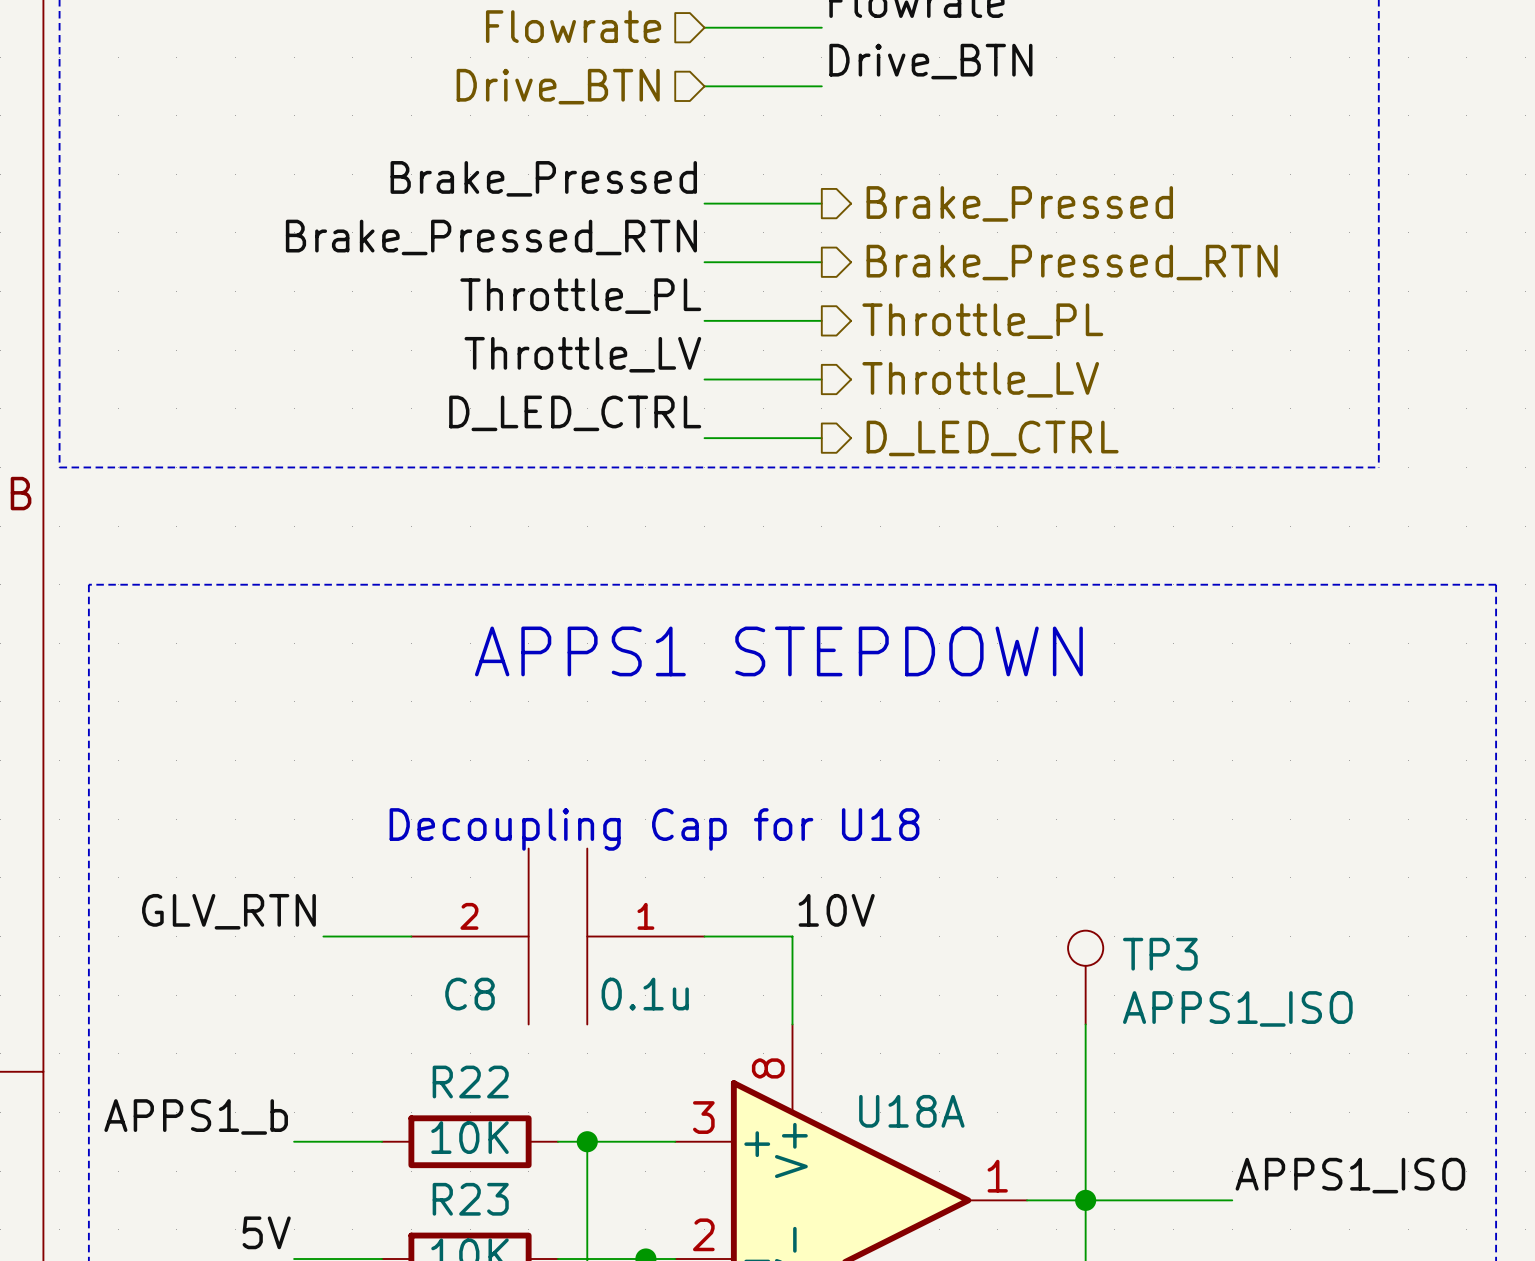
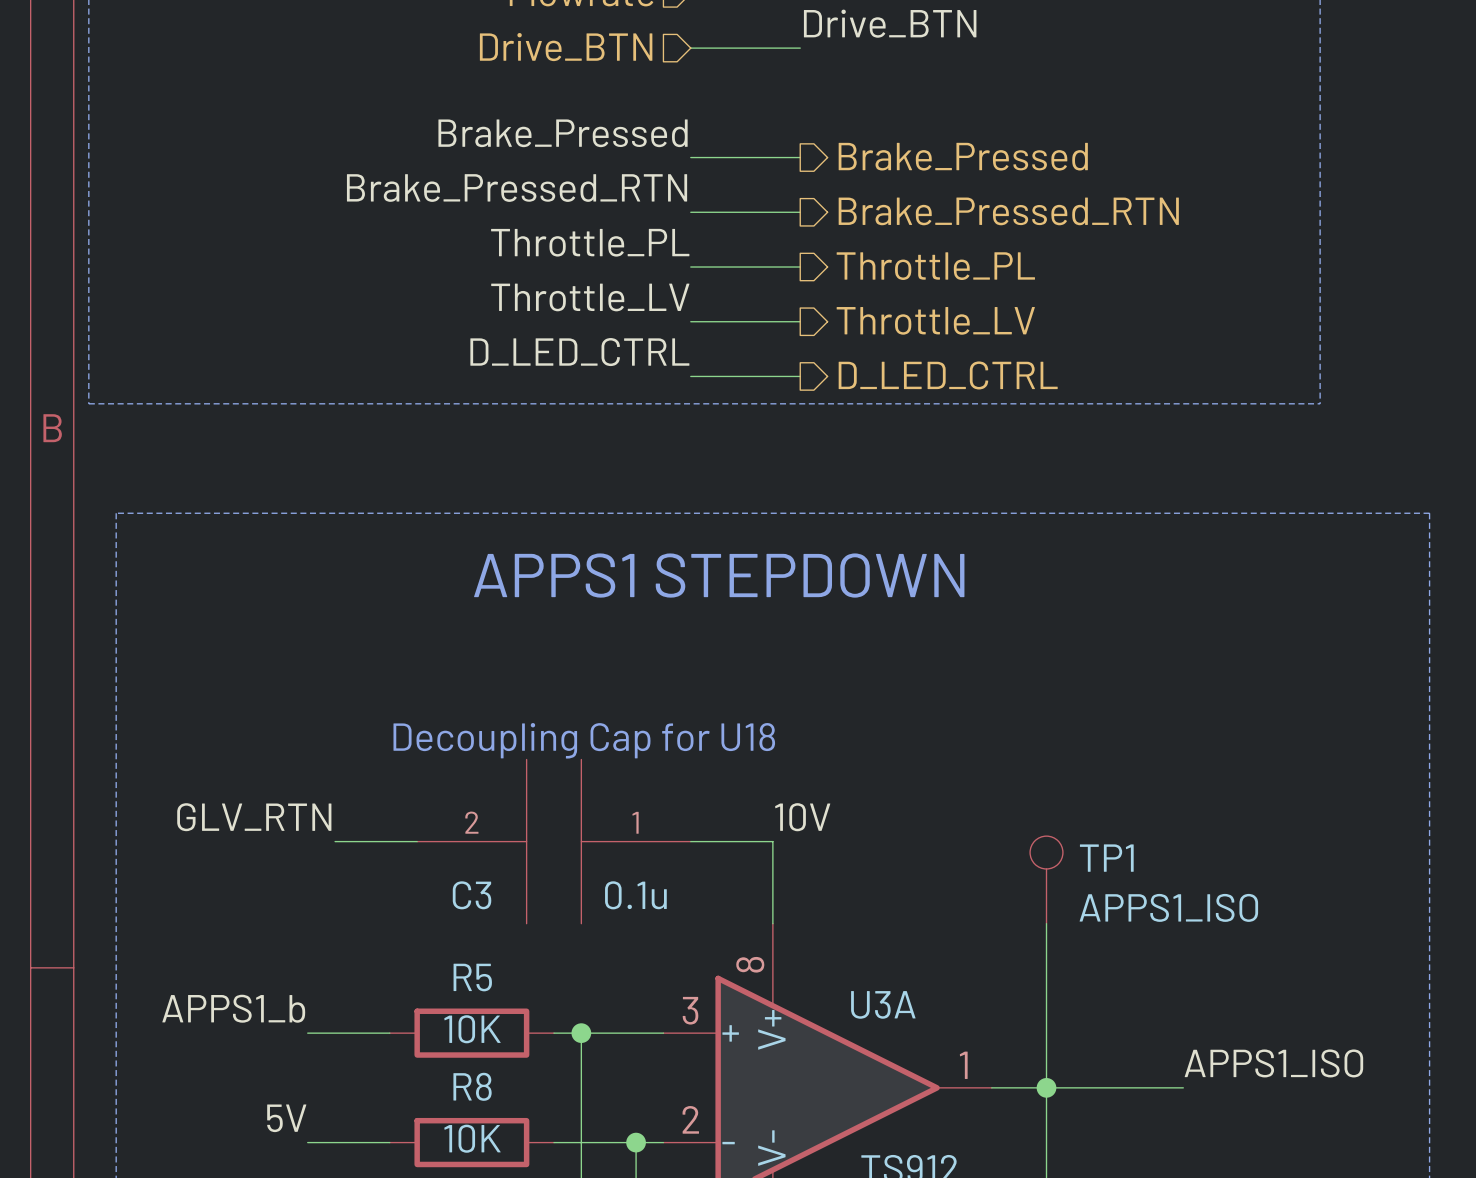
TP3 name: TP3 (1160, 954) -> TP1 (1106, 858)
C8 name: C8 (470, 994) -> C3 (472, 895)
R22 name: R22 (470, 1082) -> R5 (472, 977)
U18A name: U18A (911, 1111) -> U3A (883, 1004)
R23 name: R23 (470, 1199) -> R8 (472, 1086)

